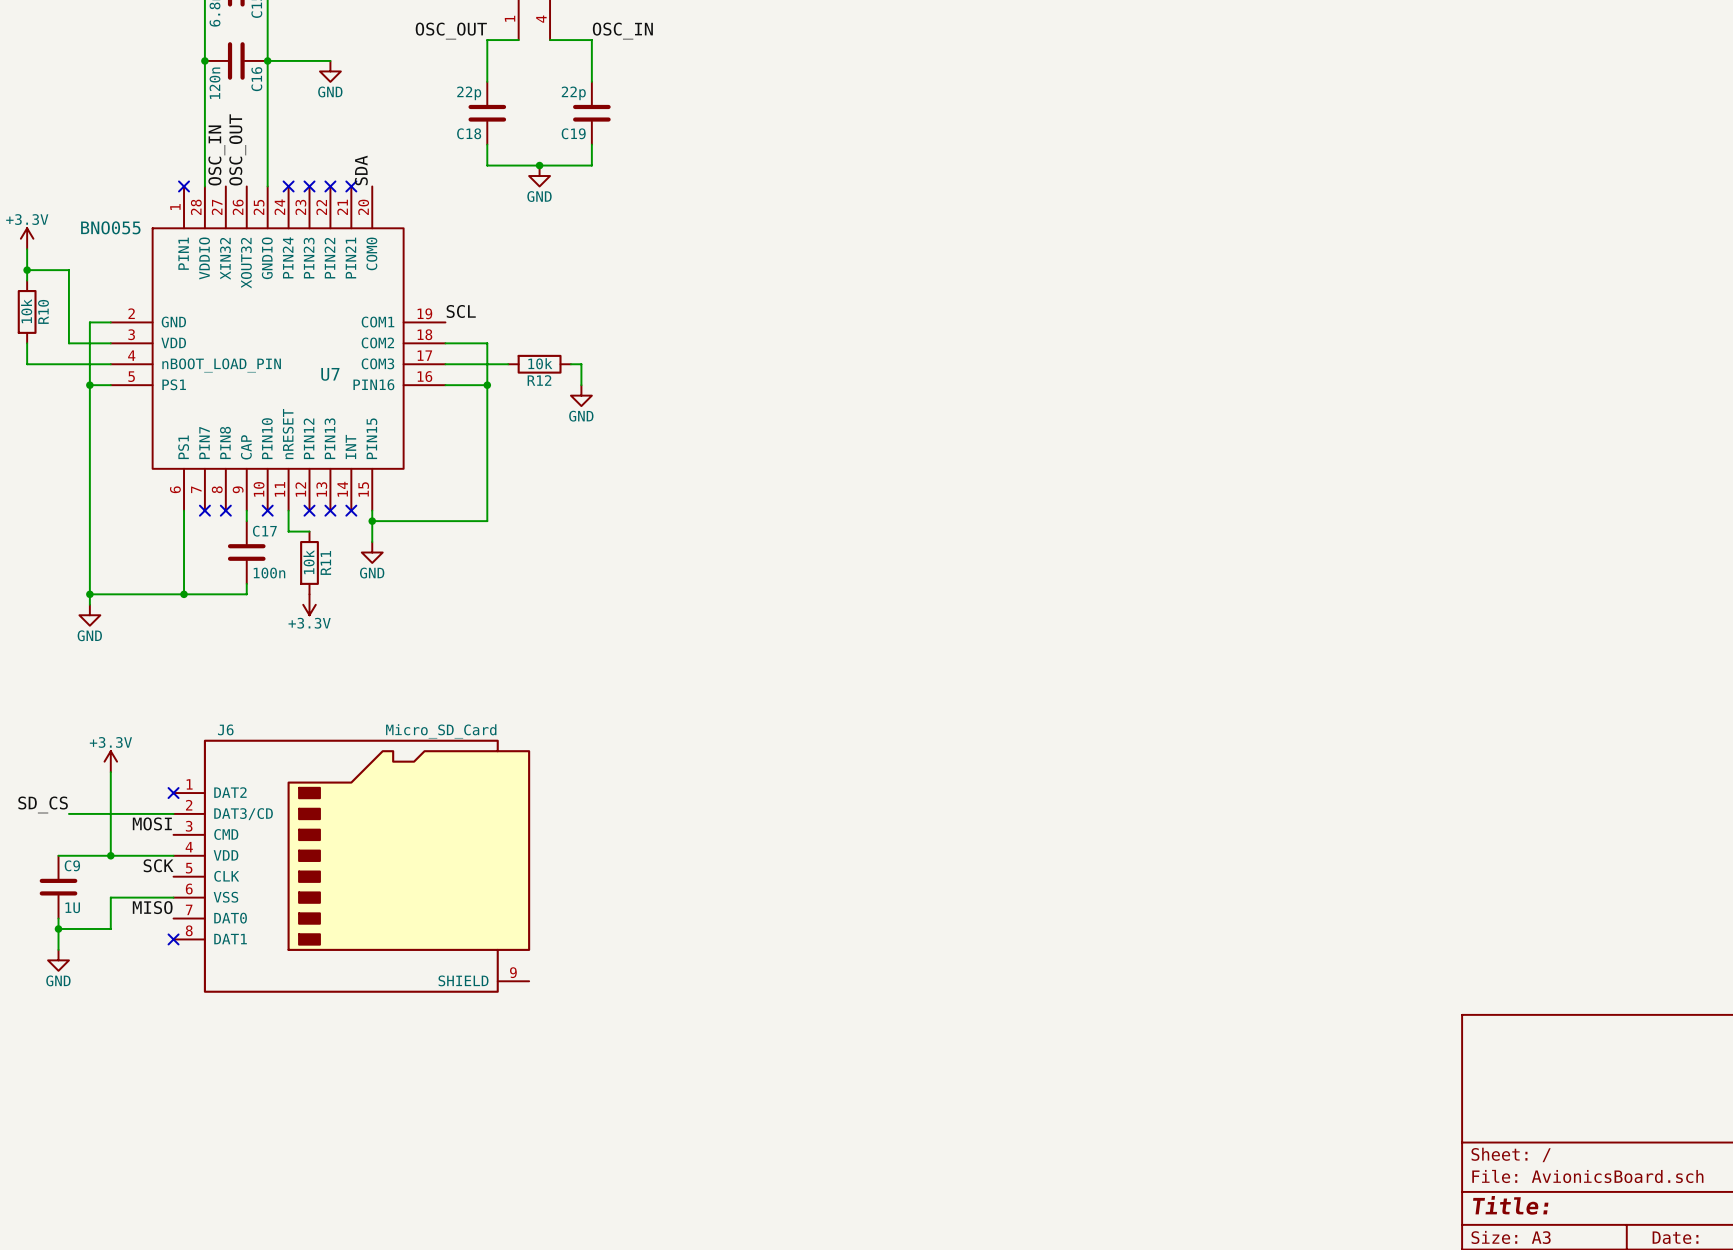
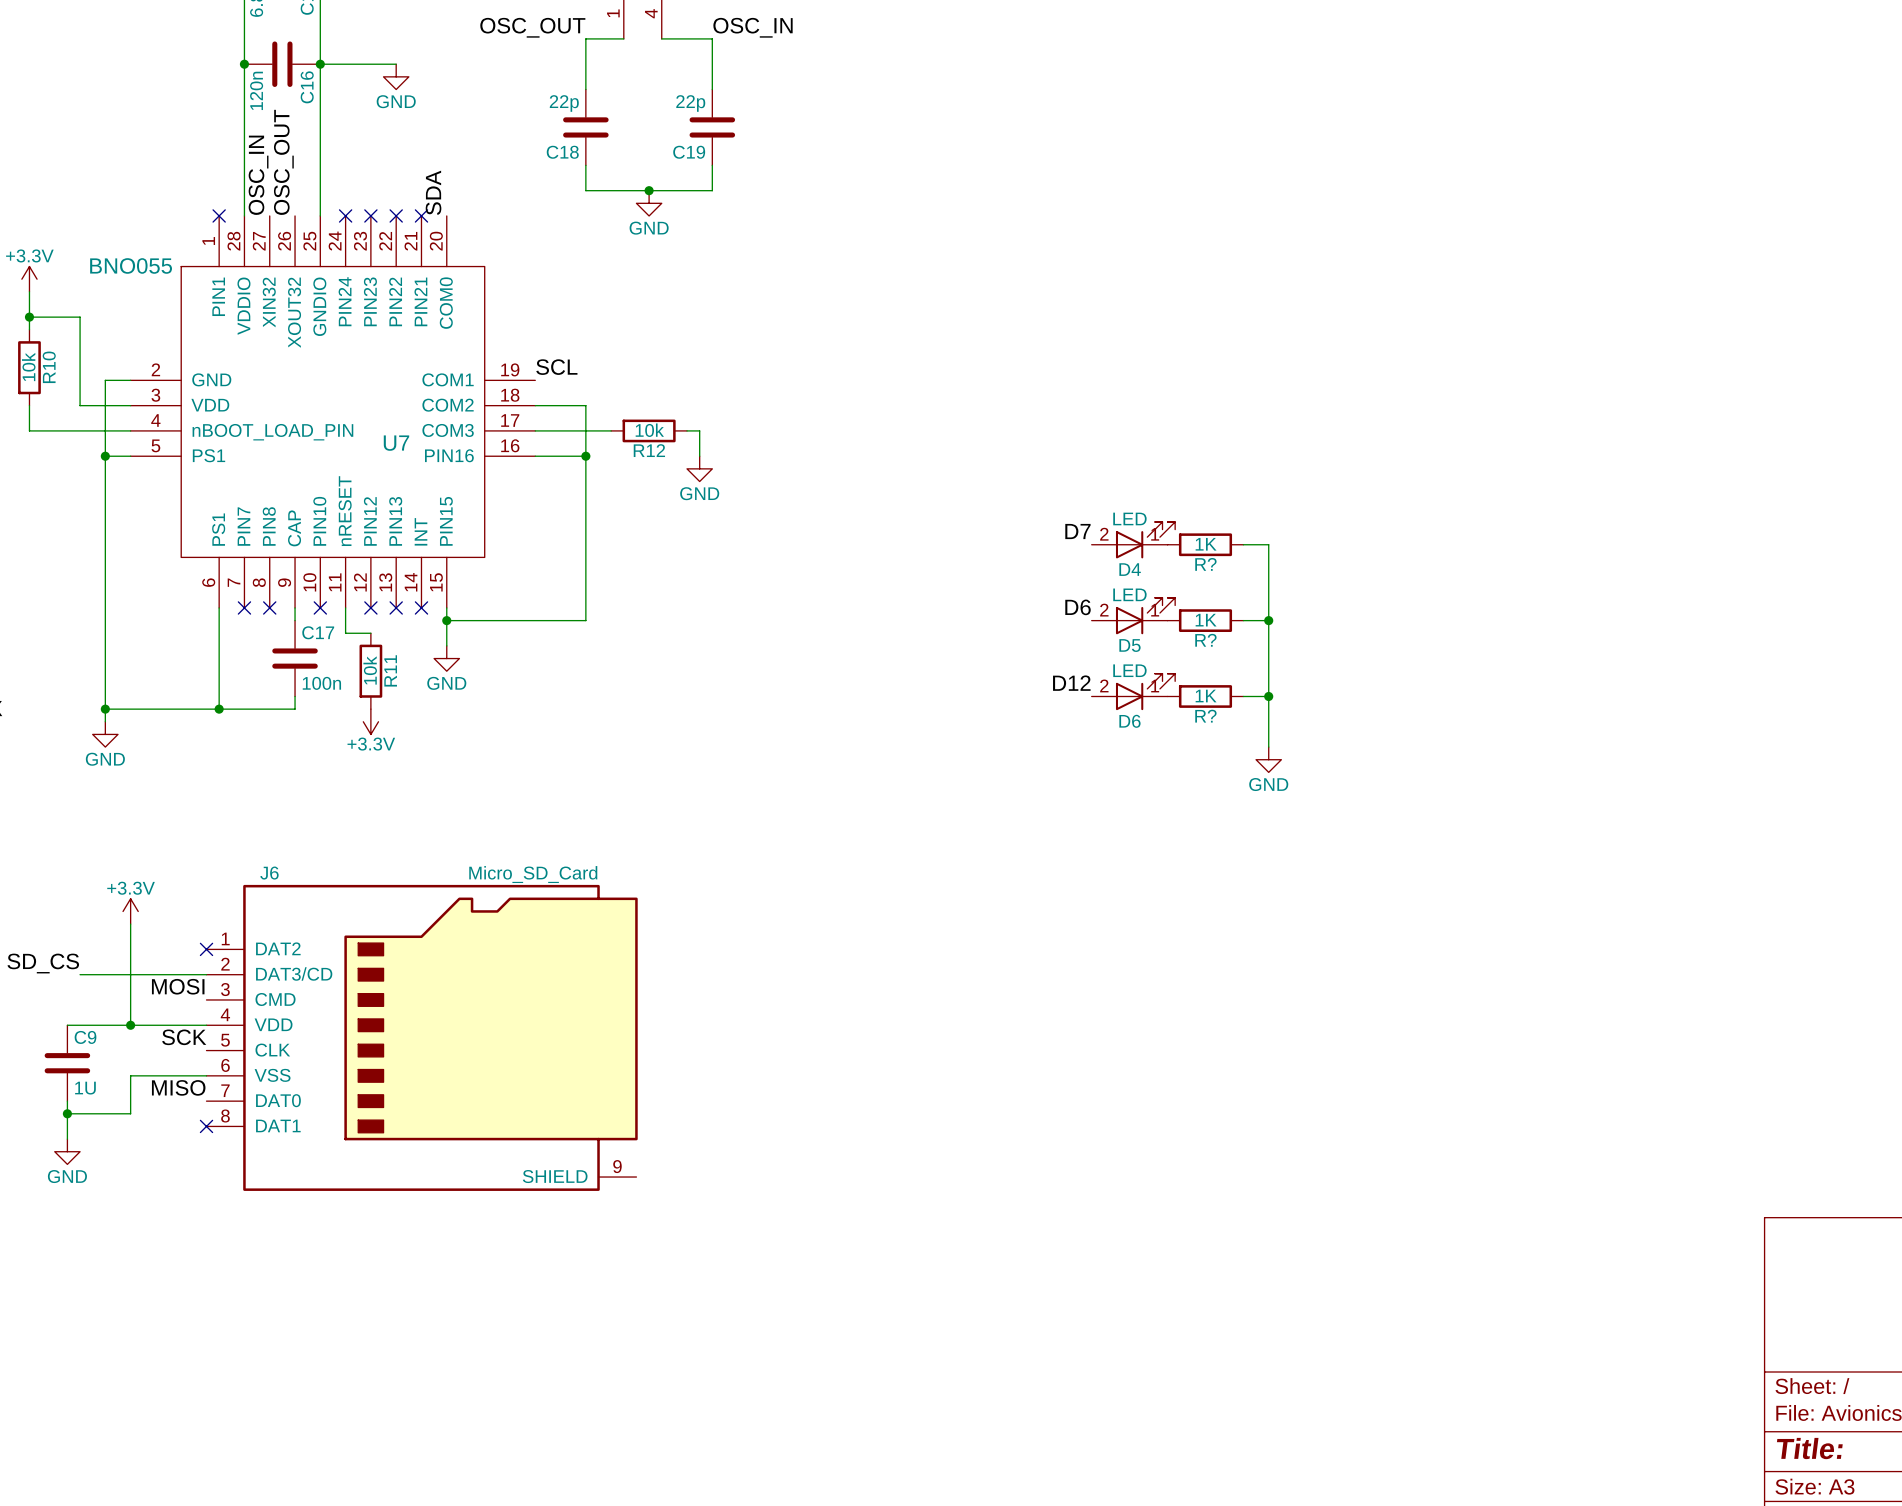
label: none -> D7 (1077, 531)
D4: none -> LED (1133, 540)
R?: none -> 1K (1205, 544)
wire: none -> (1243, 544) (1268, 544) (1268, 747)
label: none -> D6 (1078, 607)
D5: none -> LED (1133, 616)
R?: none -> 1K (1205, 620)
wire: none -> (1243, 620) (1268, 620)
junction: none -> (1268, 620)
label: none -> D12 (1071, 683)
D6: none -> LED (1133, 691)
R?: none -> 1K (1205, 696)
wire: none -> (1243, 696) (1268, 696)
junction: none -> (1268, 696)
power symbol: none -> GND (1268, 759)

